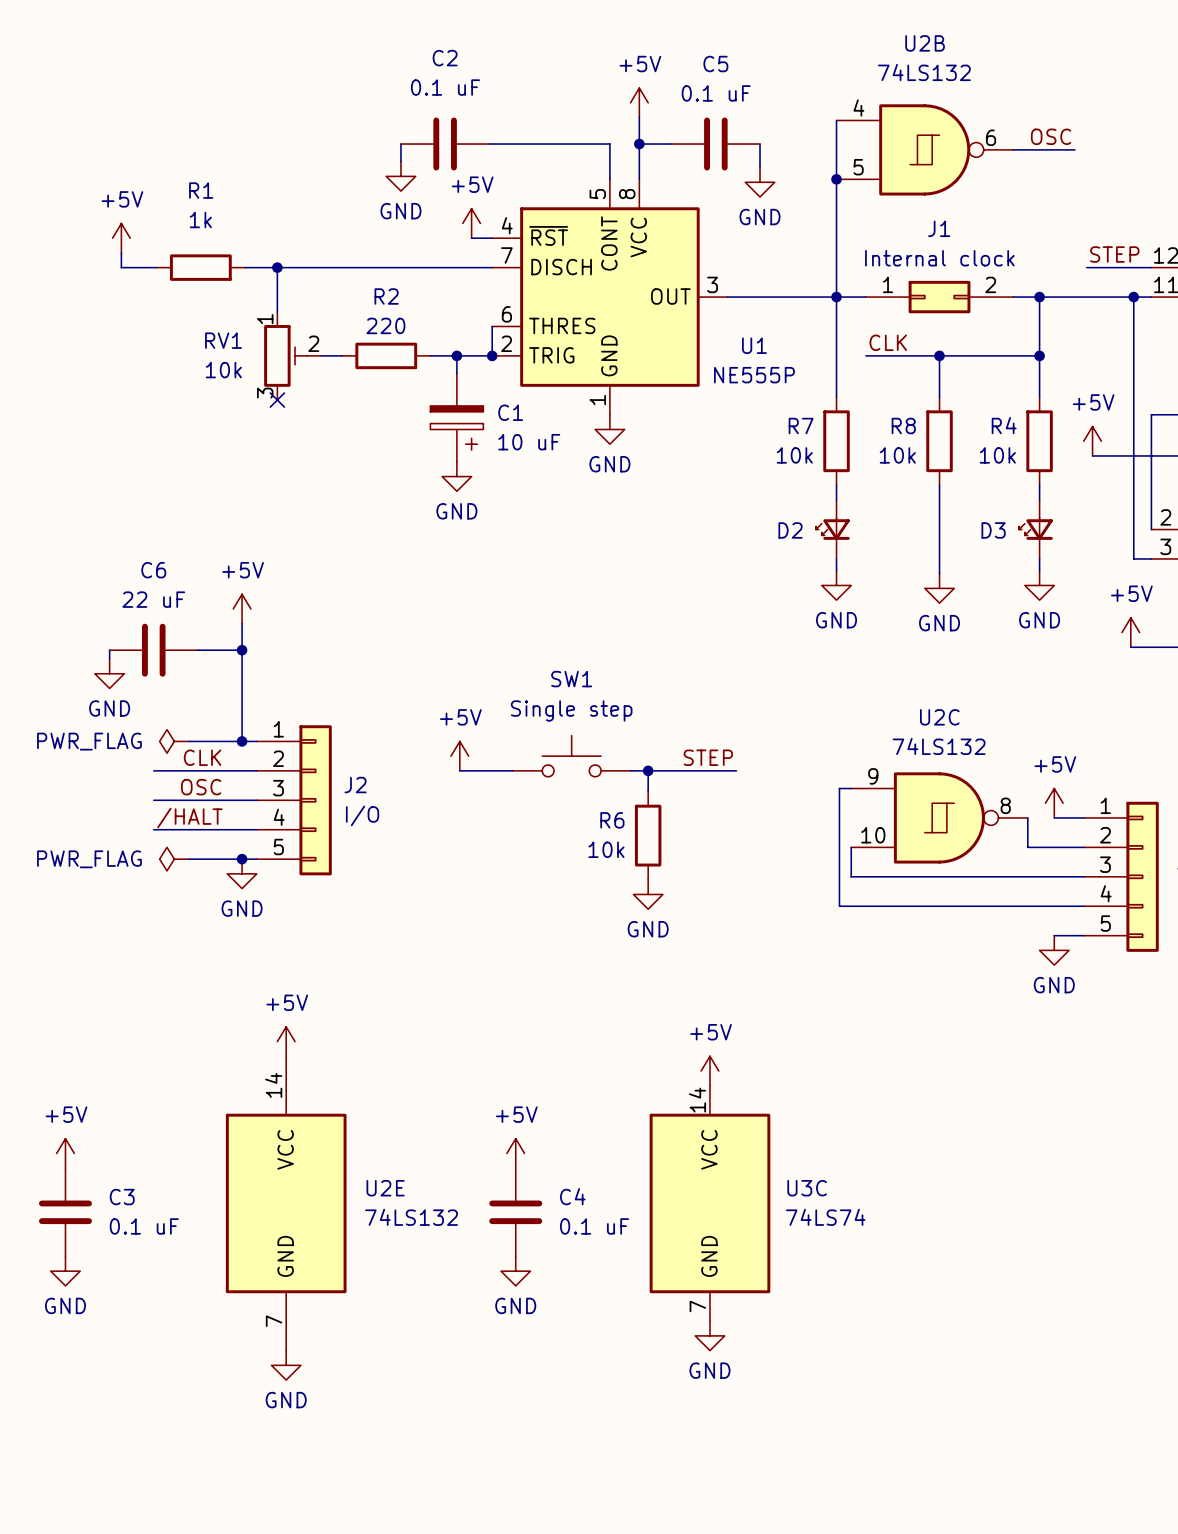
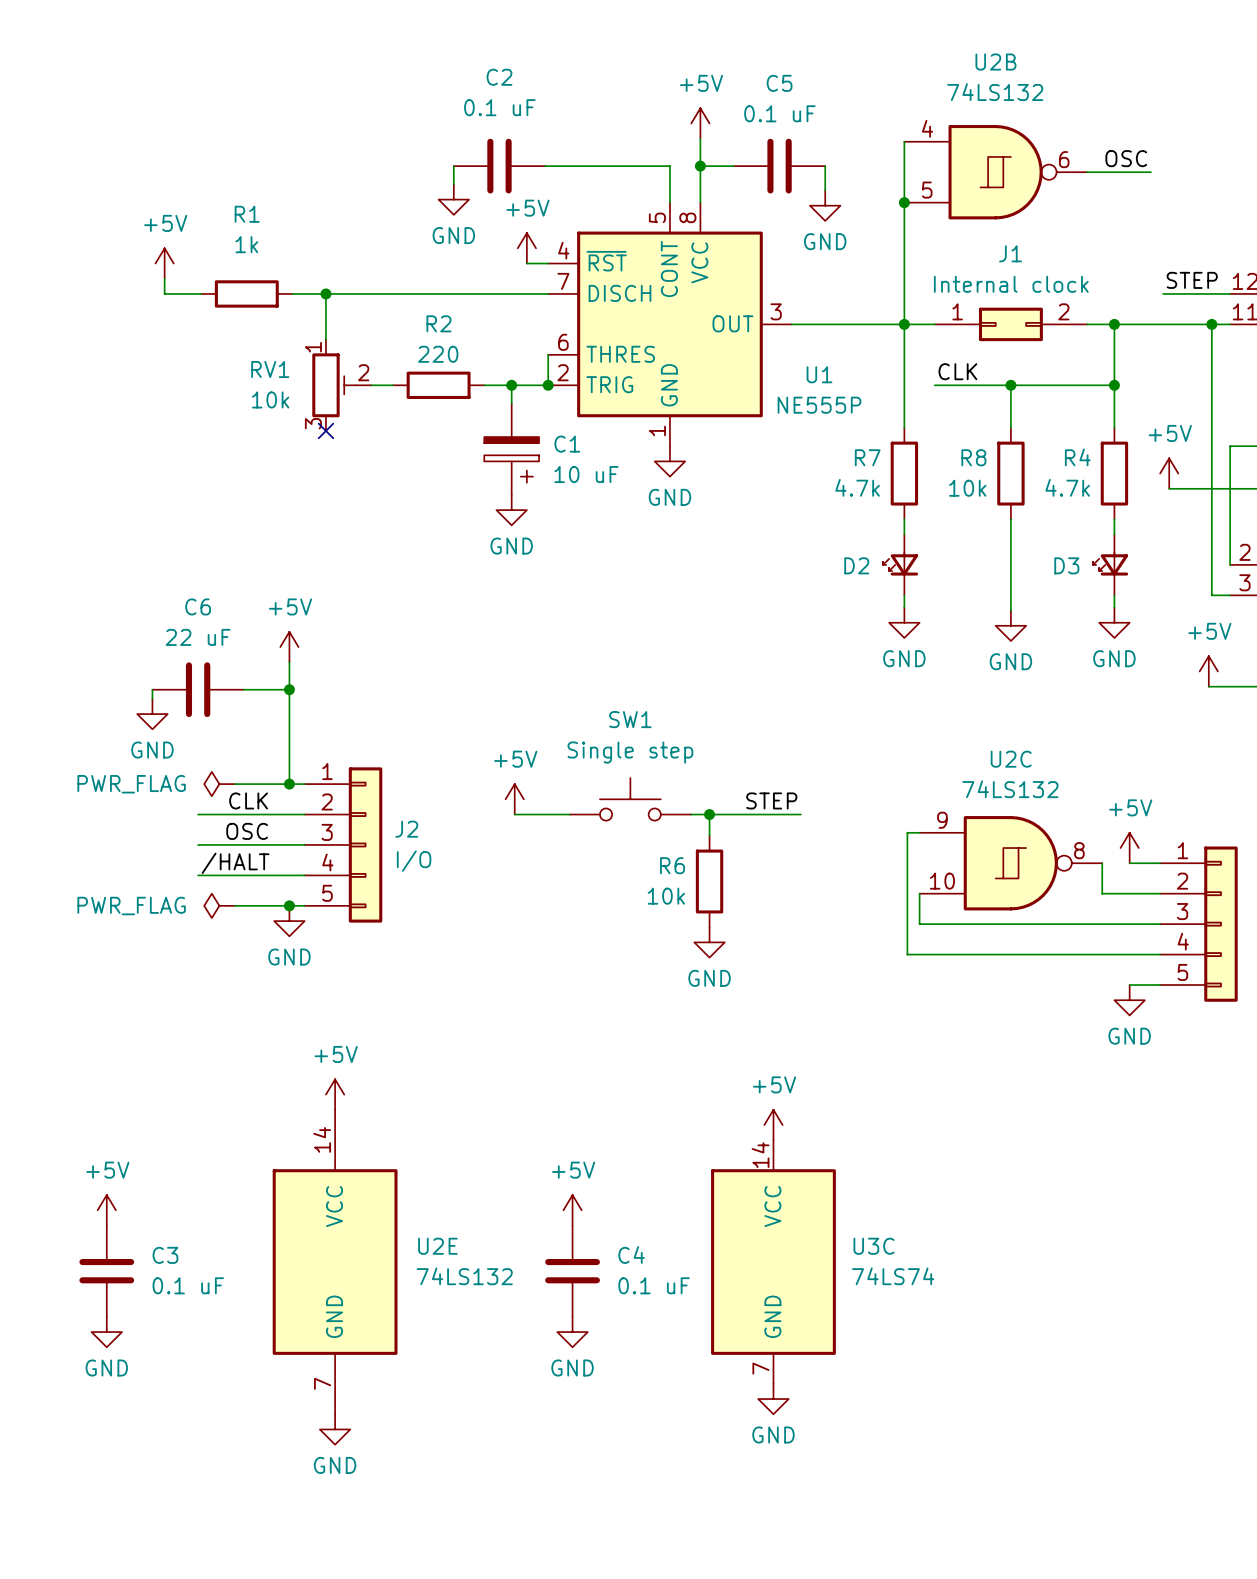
R7 value: 10k (794, 455) -> 4.7k (857, 487)
R4 value: 10k (997, 455) -> 4.7k (1067, 487)

